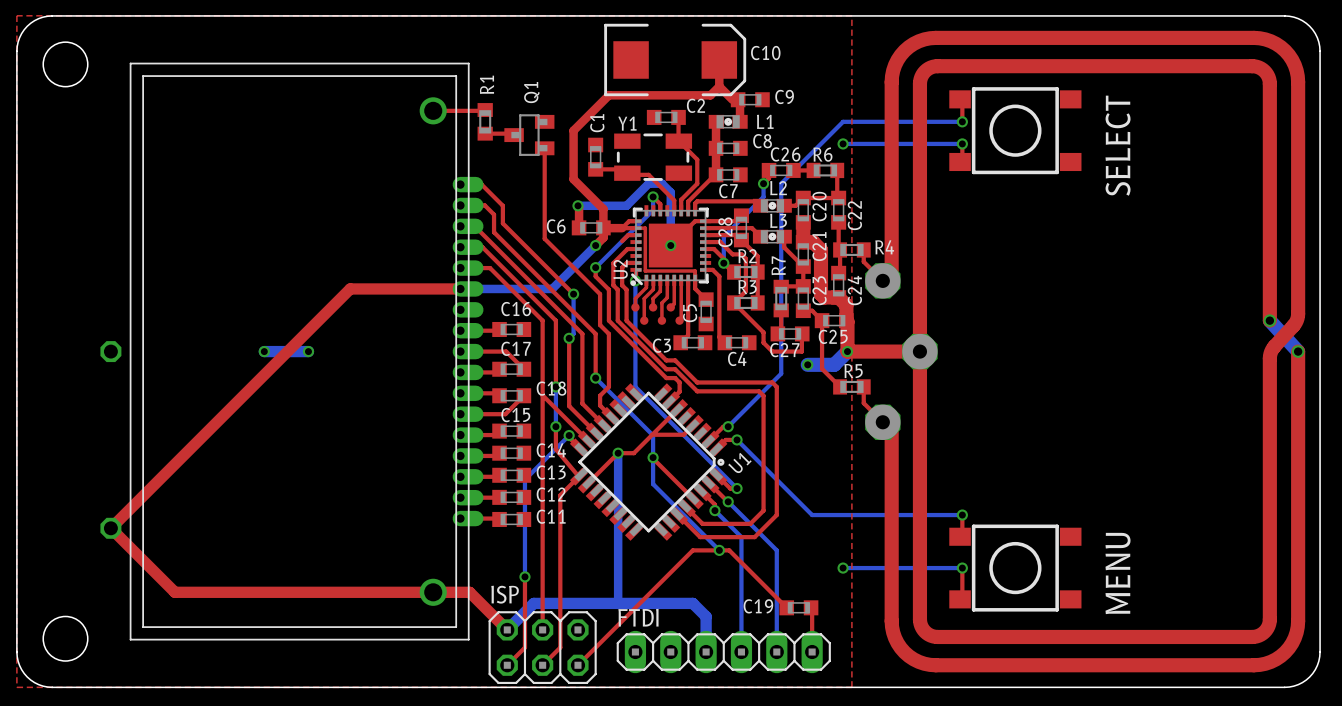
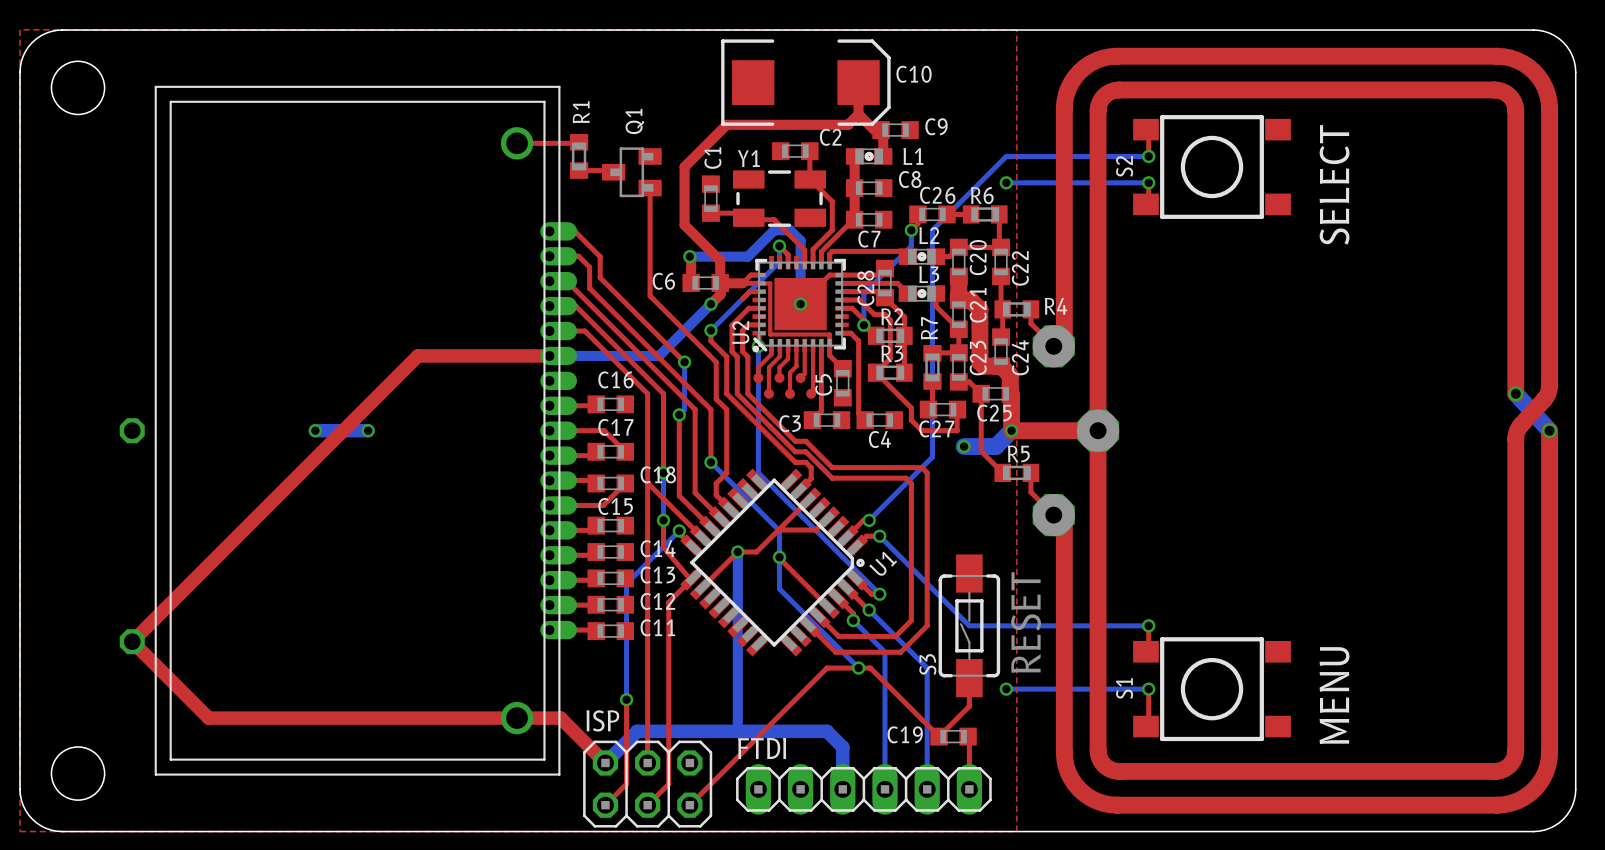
text: none -> S2 (1124, 166)
S3: none -> RESET (969, 625)
top track: none -> (969, 678) (969, 706) (939, 736)
text: none -> S1 (1124, 688)

